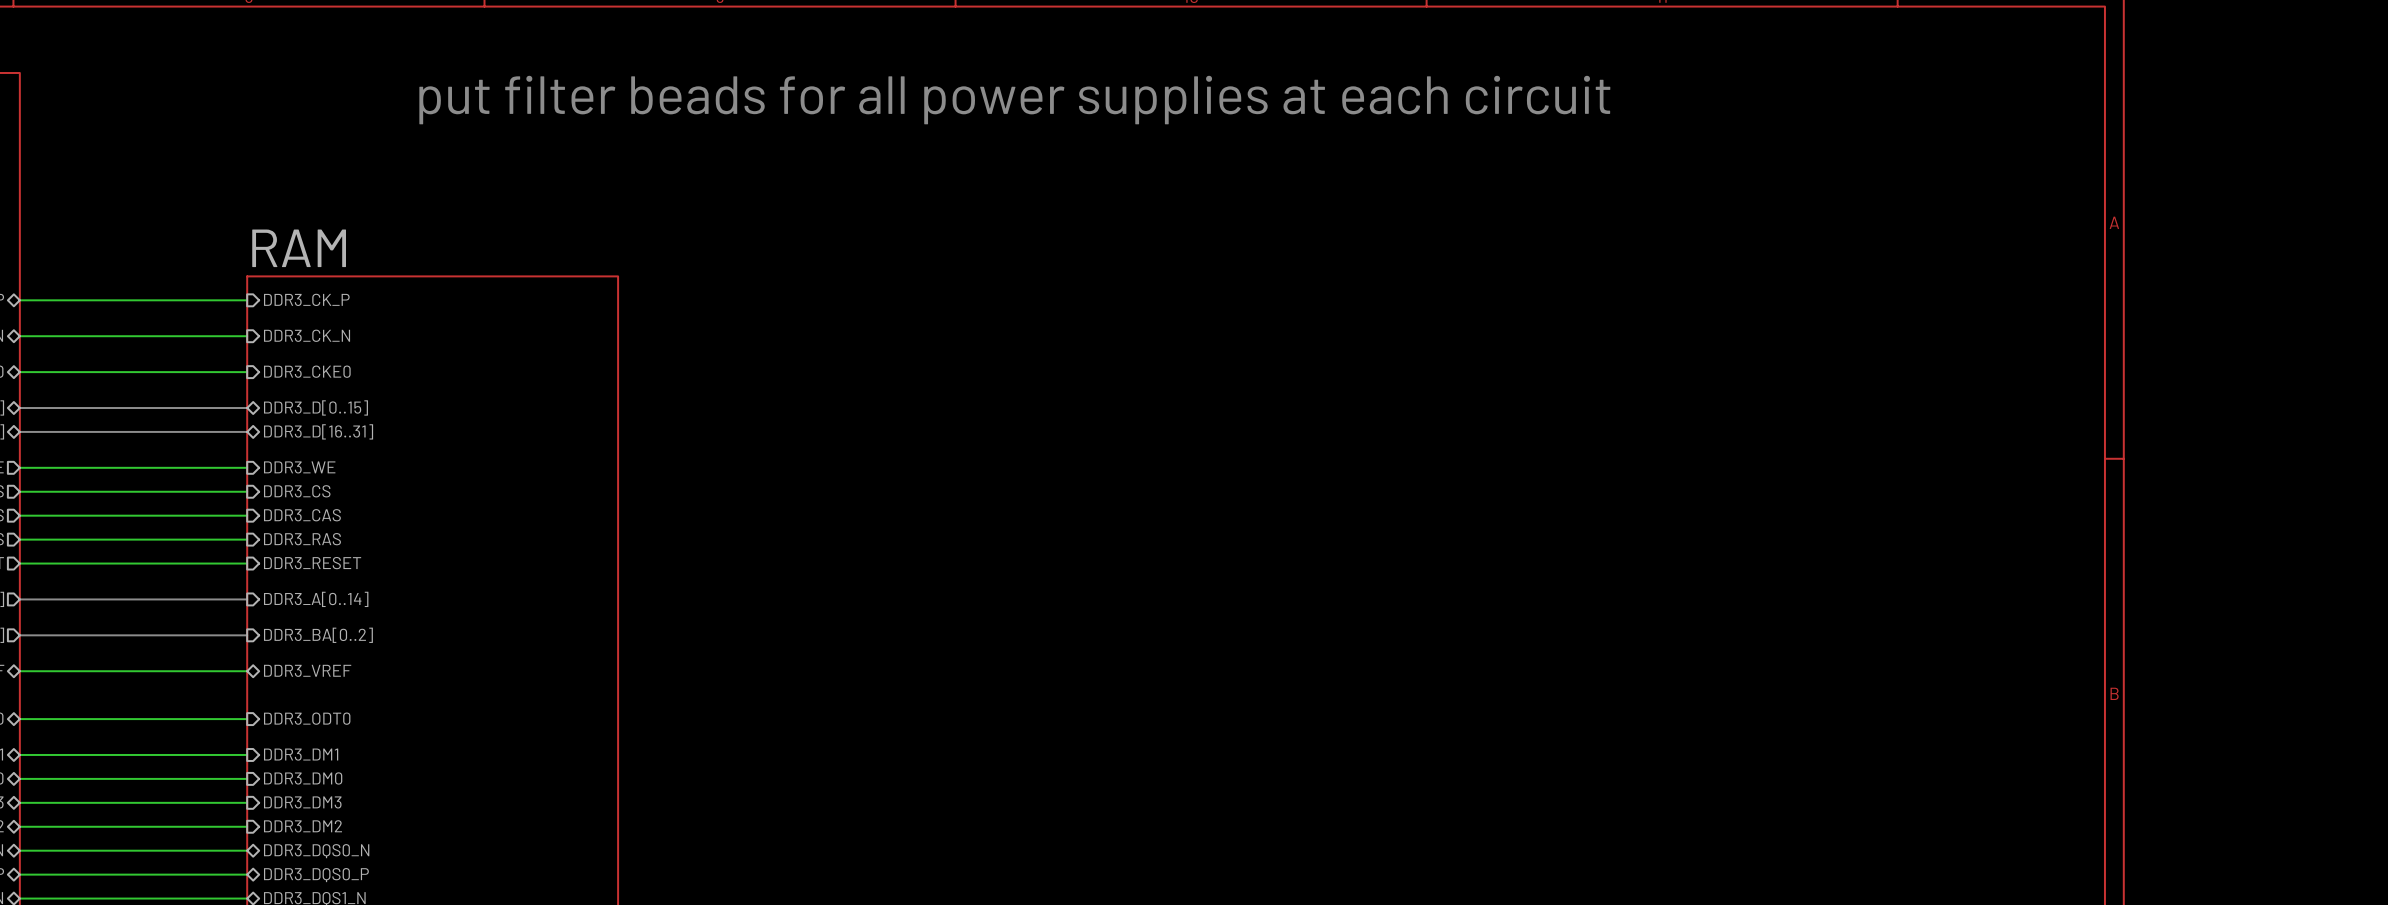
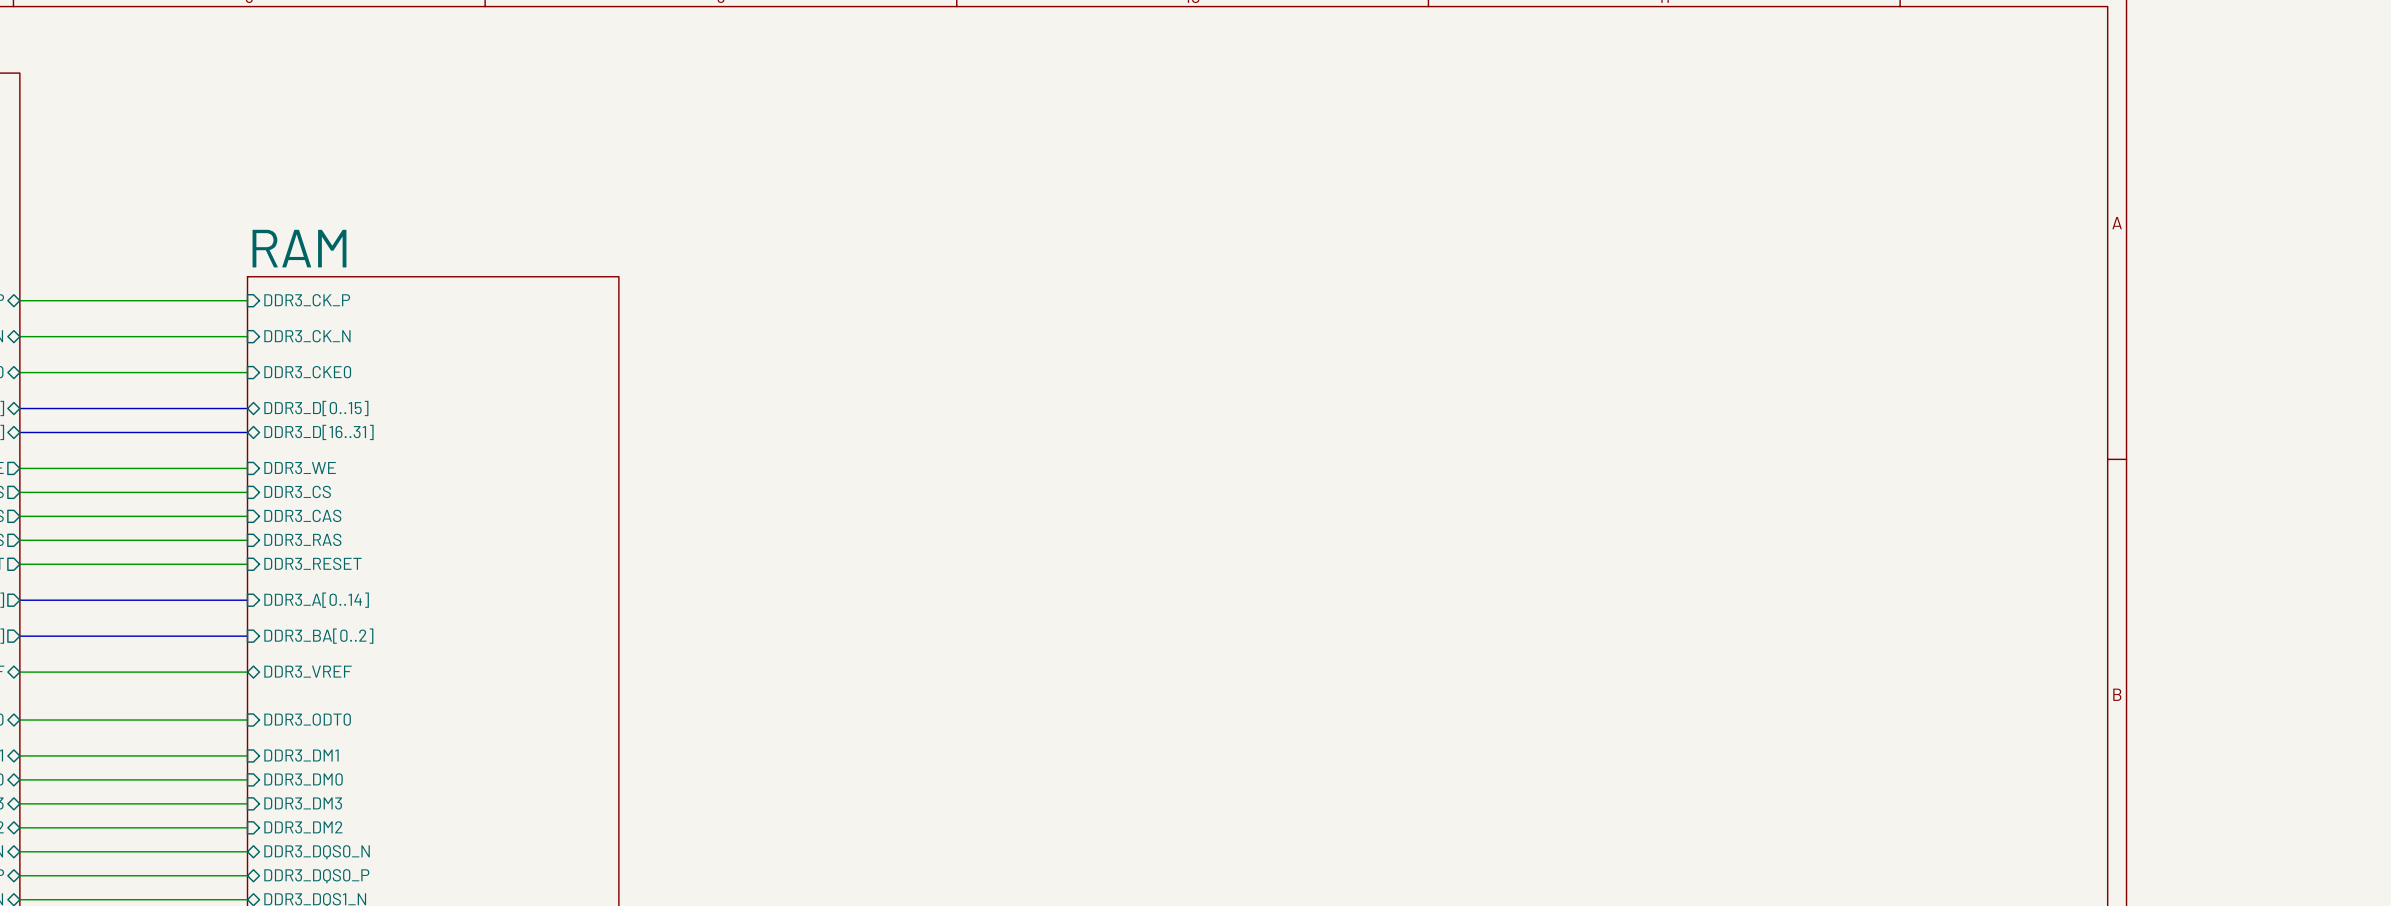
text: put filter beads for all power supplies at each circuit (1014, 100) -> none

